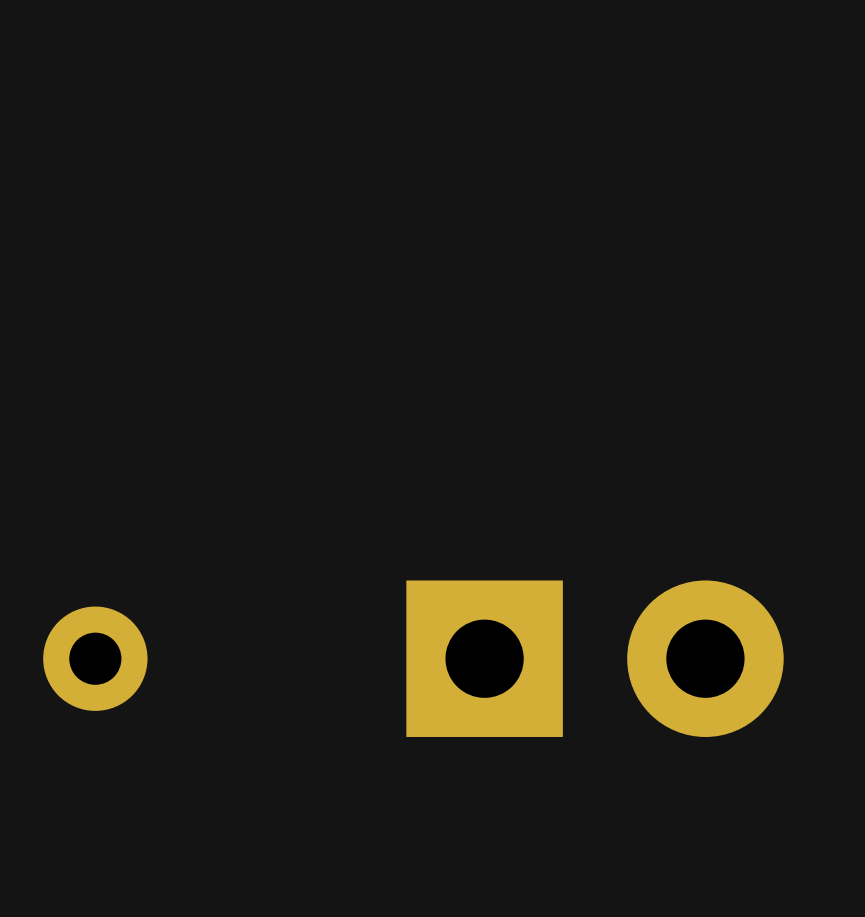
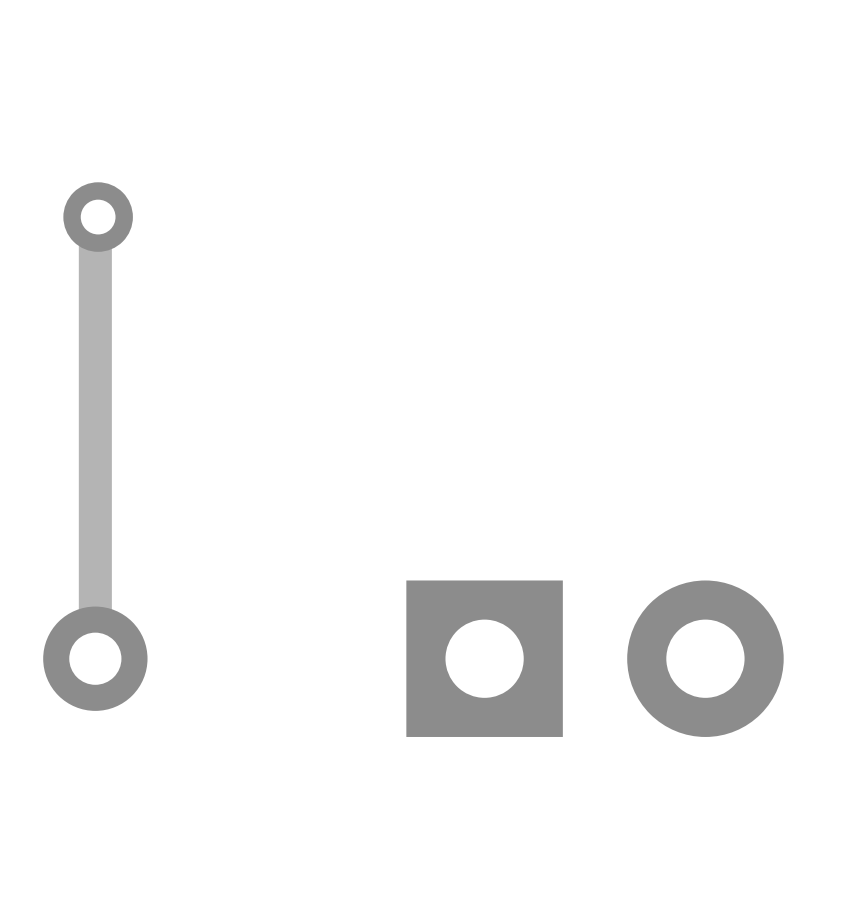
track: none -> (98, 217) (95, 219) (95, 658)
via: none -> (98, 217)

